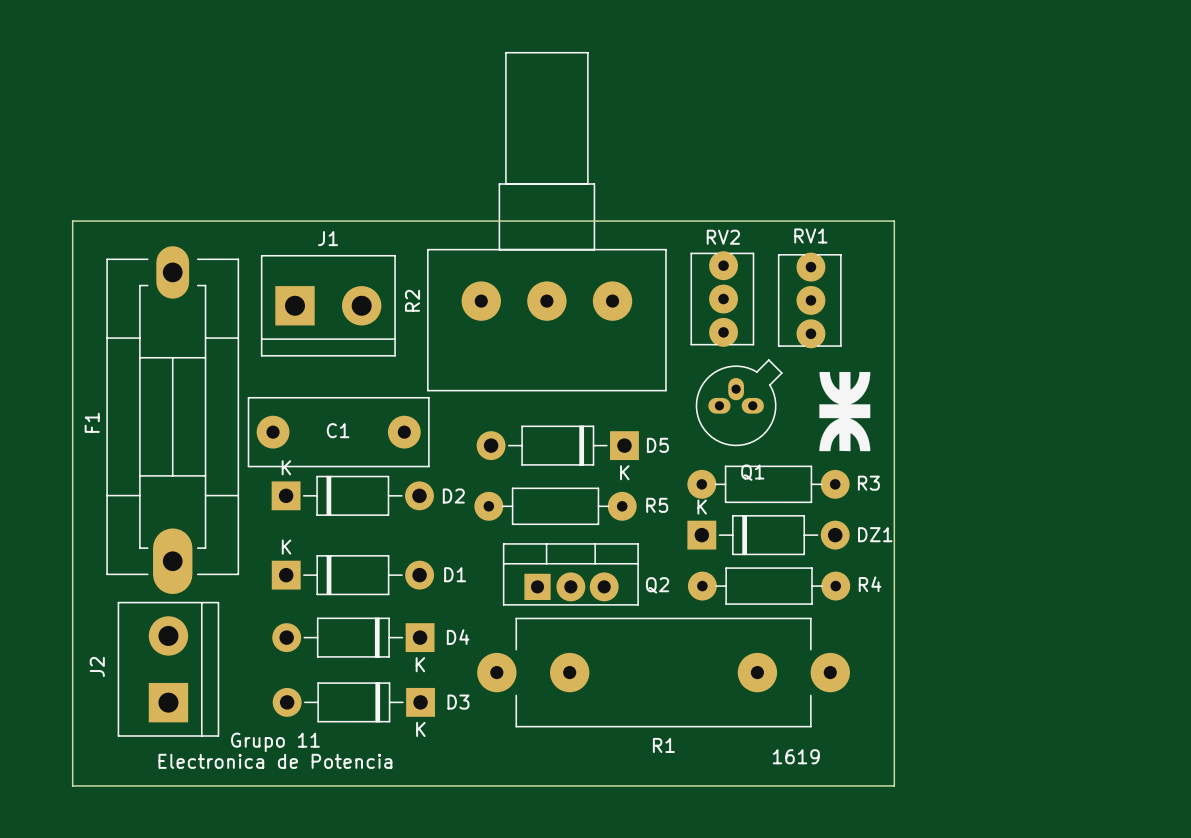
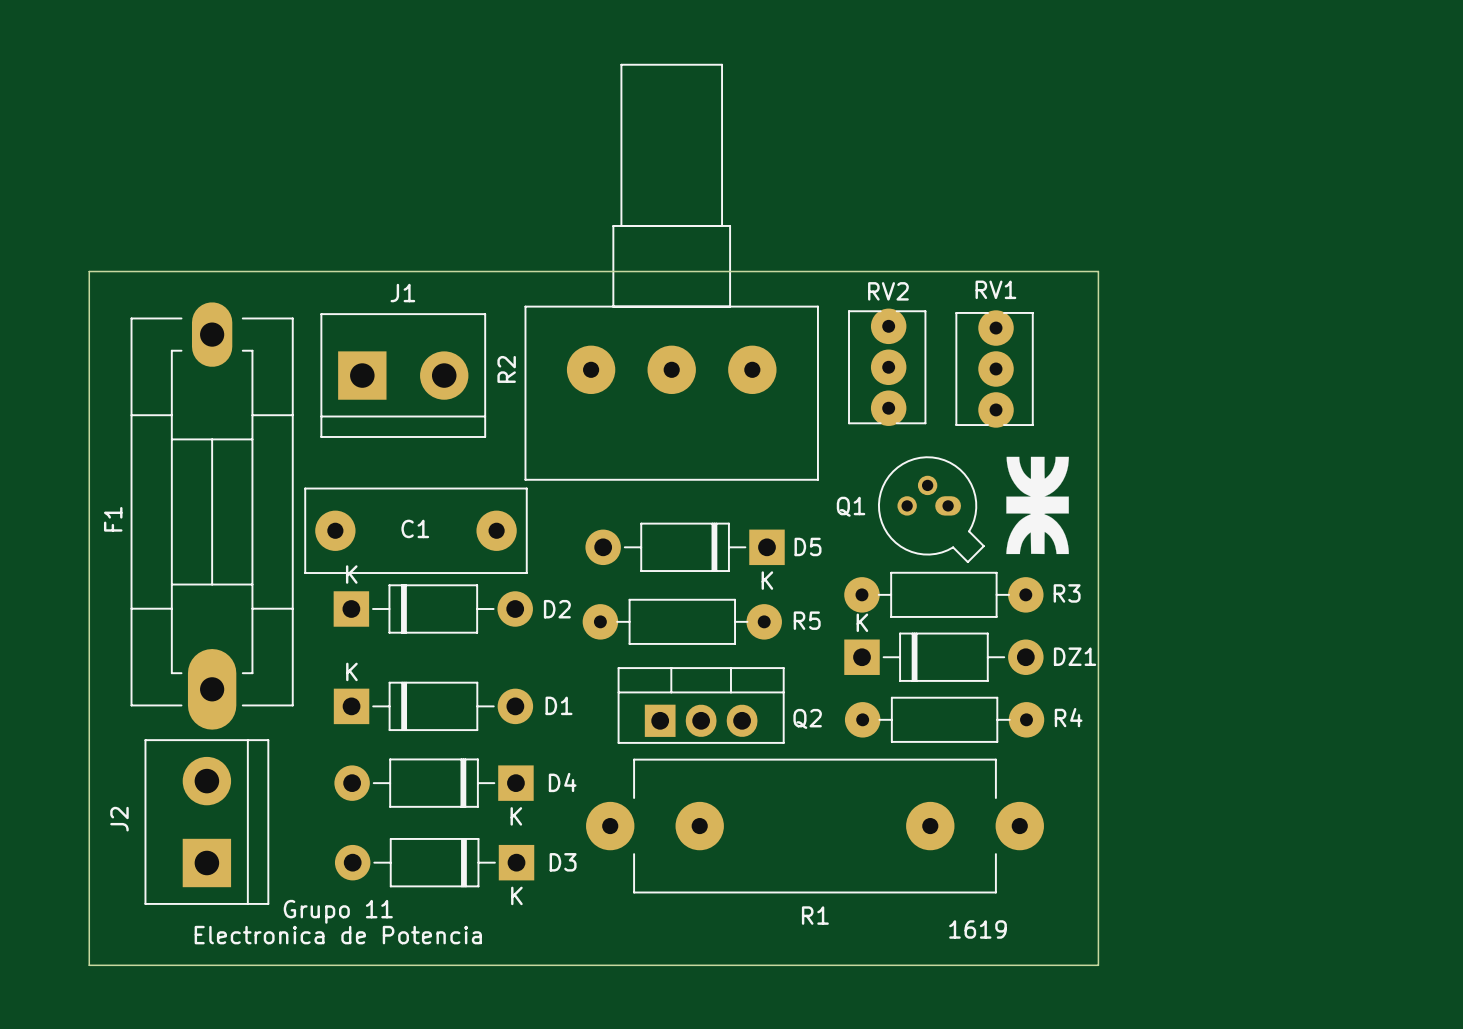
Q1 footprint: [695, 359, 783, 447] -> [877, 456, 985, 564]
Q1 name position: Q1 (752, 472) -> Q1 (851, 506)
Q2 footprint: [502, 543, 639, 606] -> [617, 667, 785, 744]

